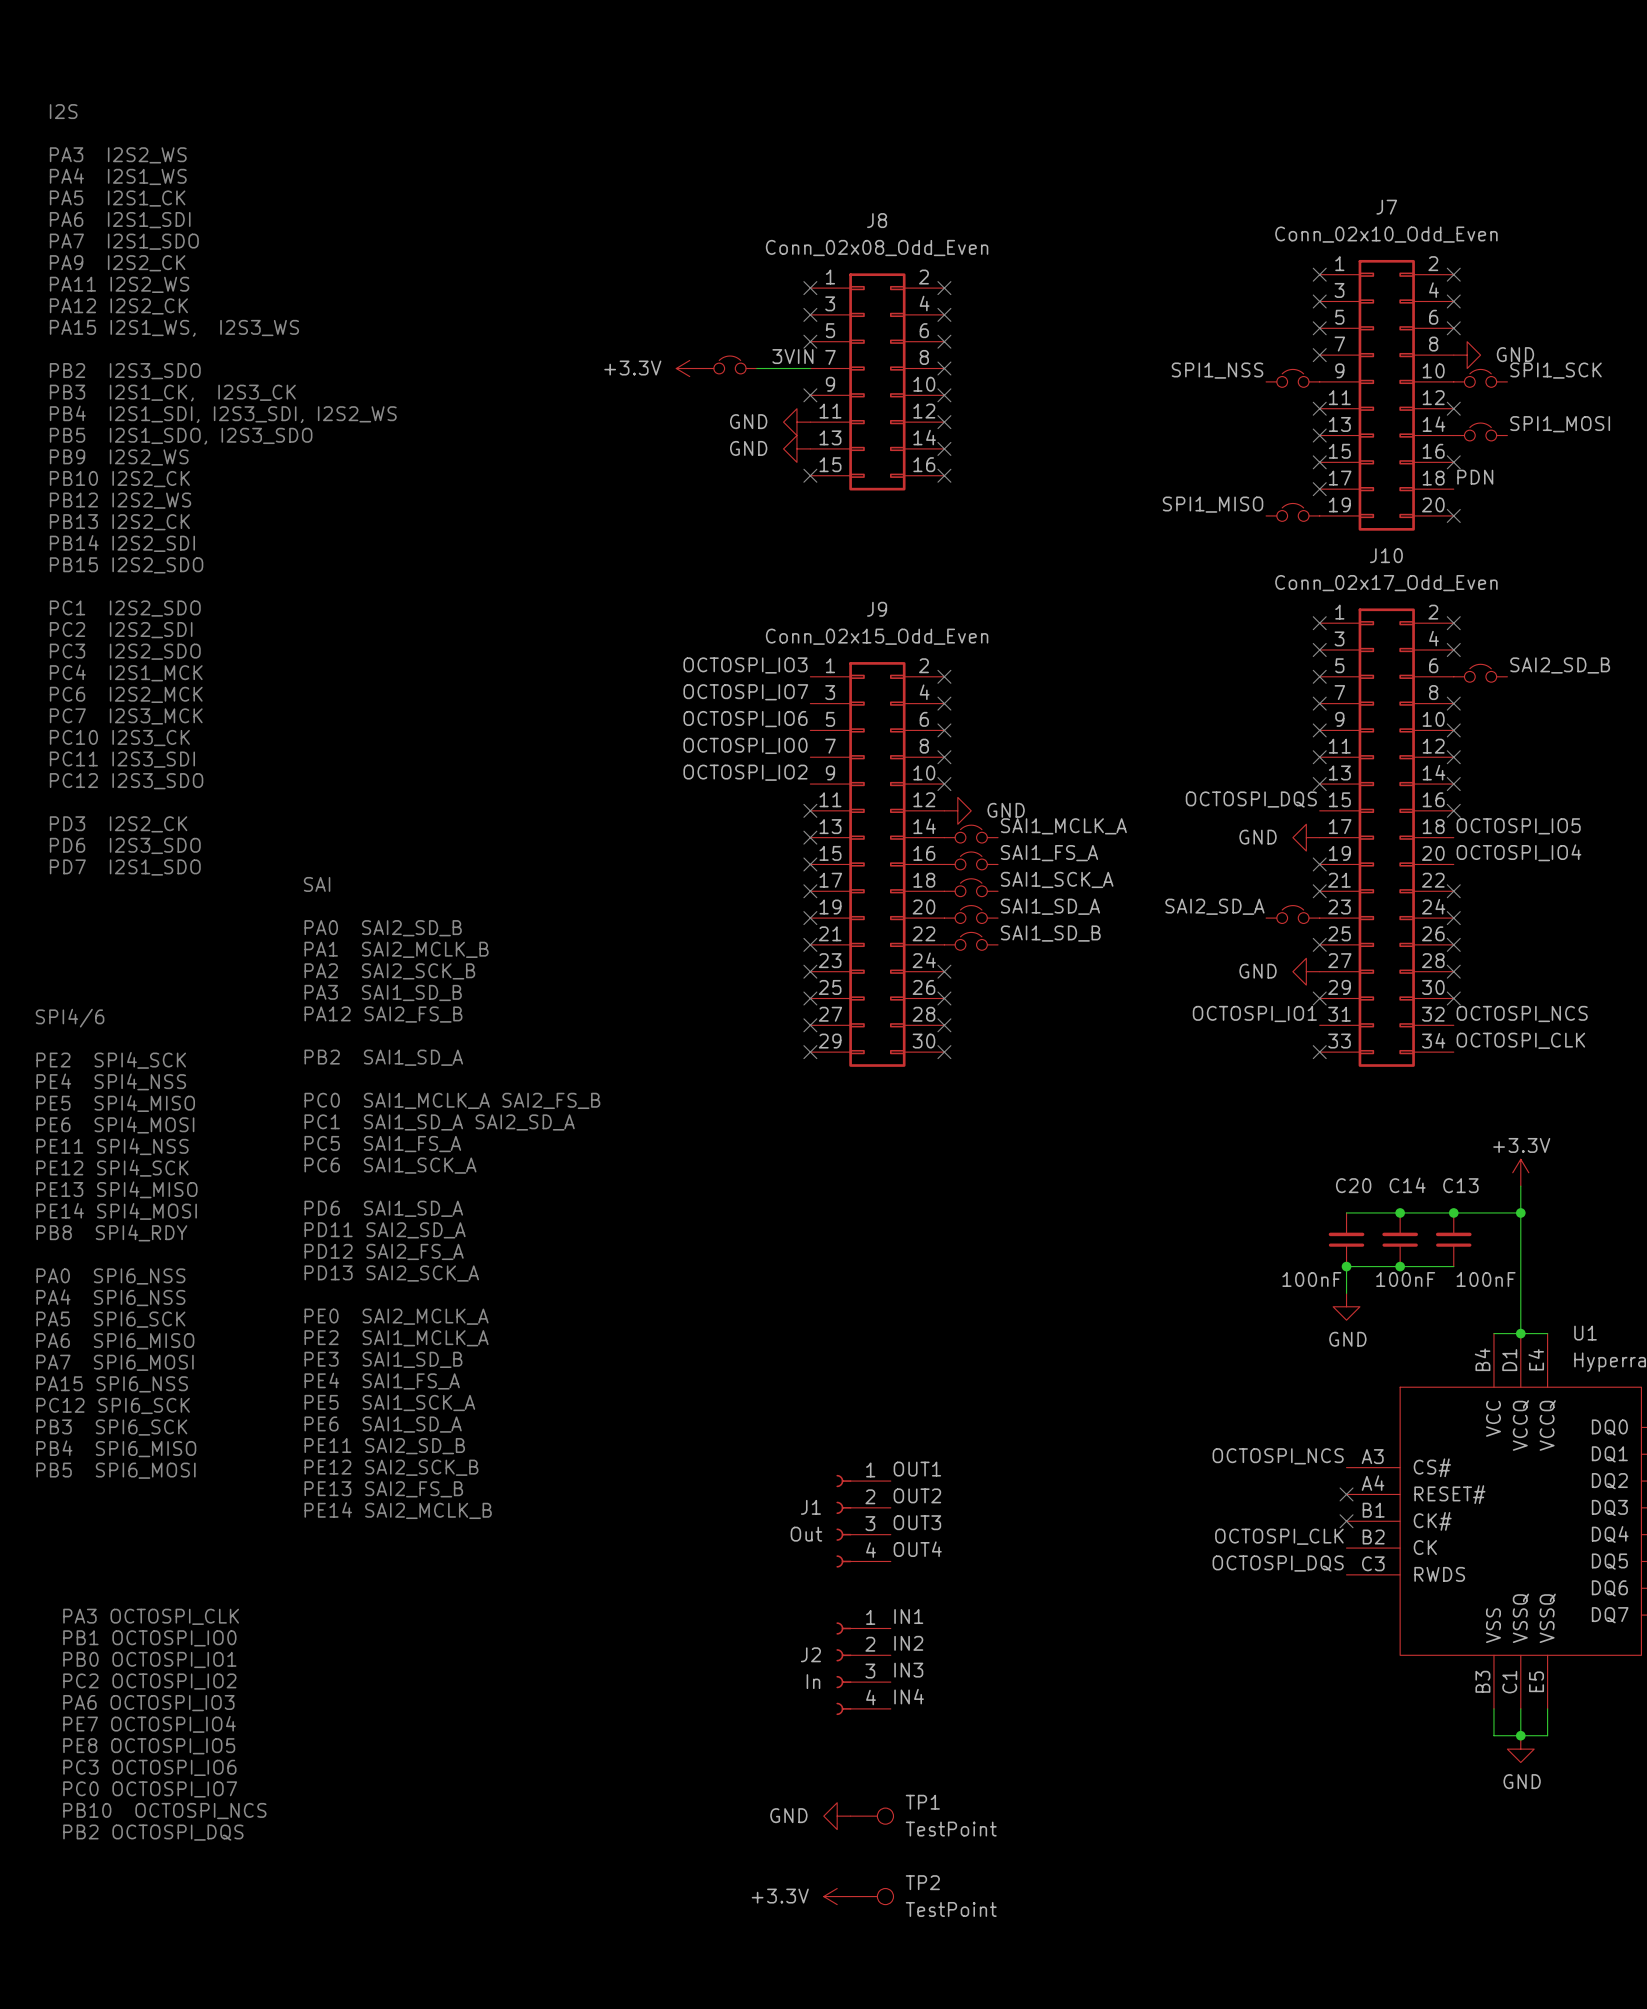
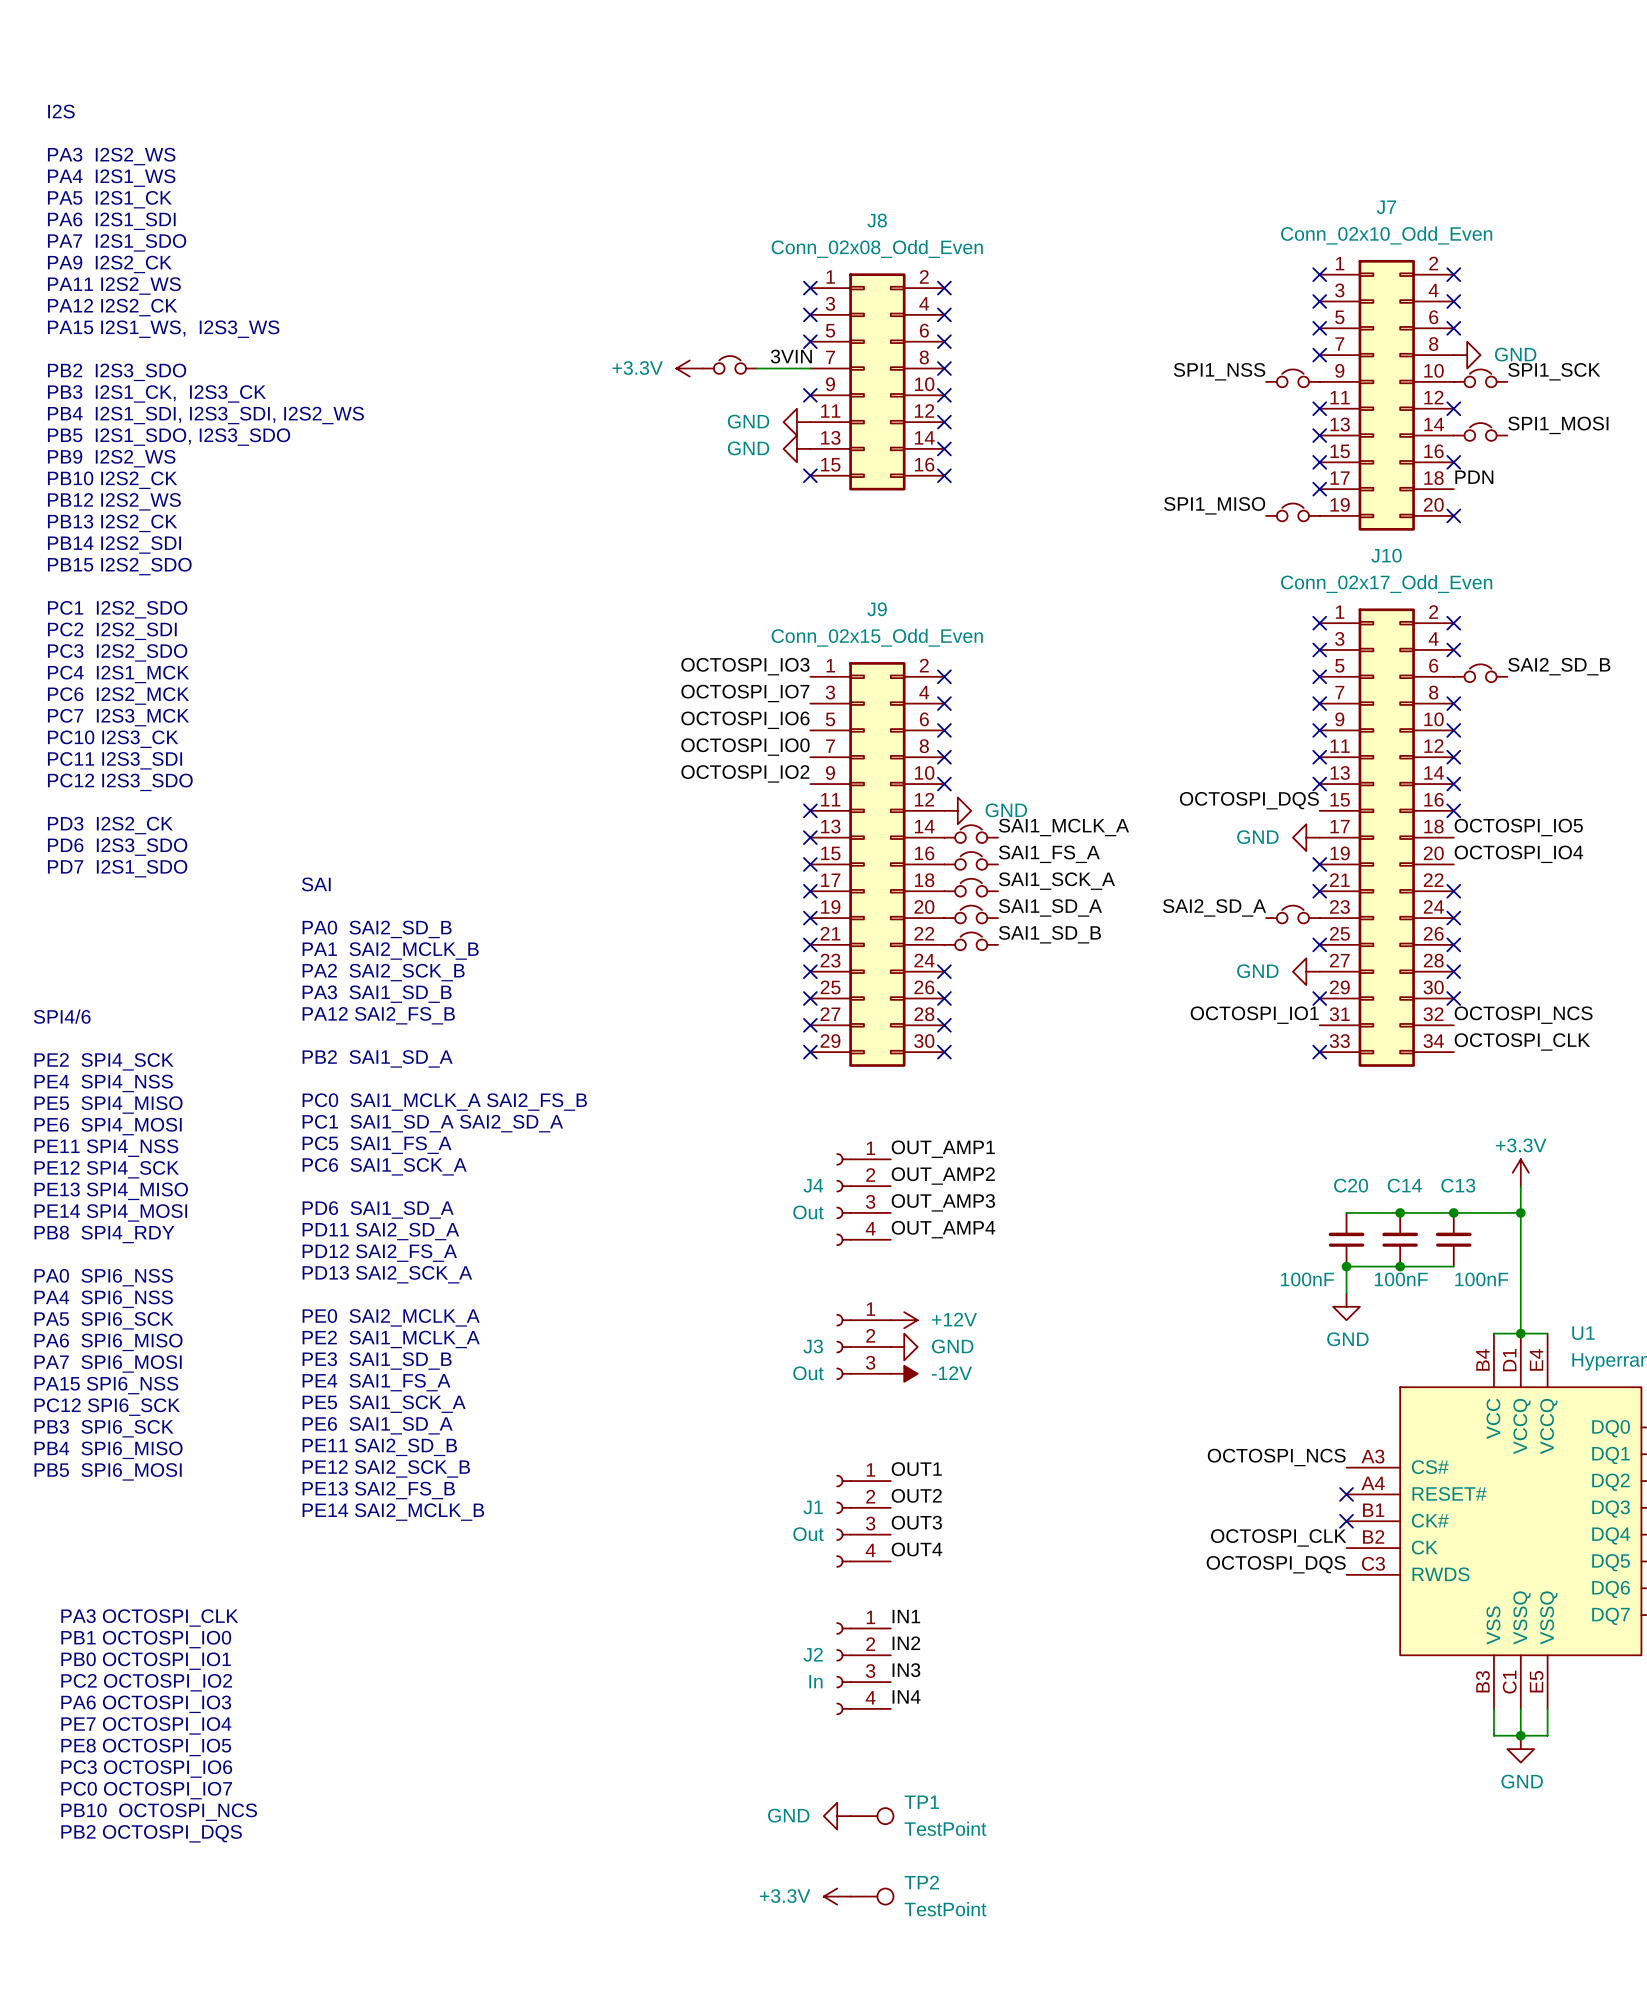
label: none -> OUT_AMP1 (943, 1149)
label: none -> OUT_AMP2 (943, 1176)
J4: none -> Out (863, 1199)
label: none -> OUT_AMP3 (943, 1202)
label: none -> OUT_AMP4 (943, 1229)
power symbol: none -> +12V (904, 1320)
J3: none -> Out (863, 1347)
power symbol: none -> GND (904, 1347)
power symbol: none -> -12V (904, 1373)

